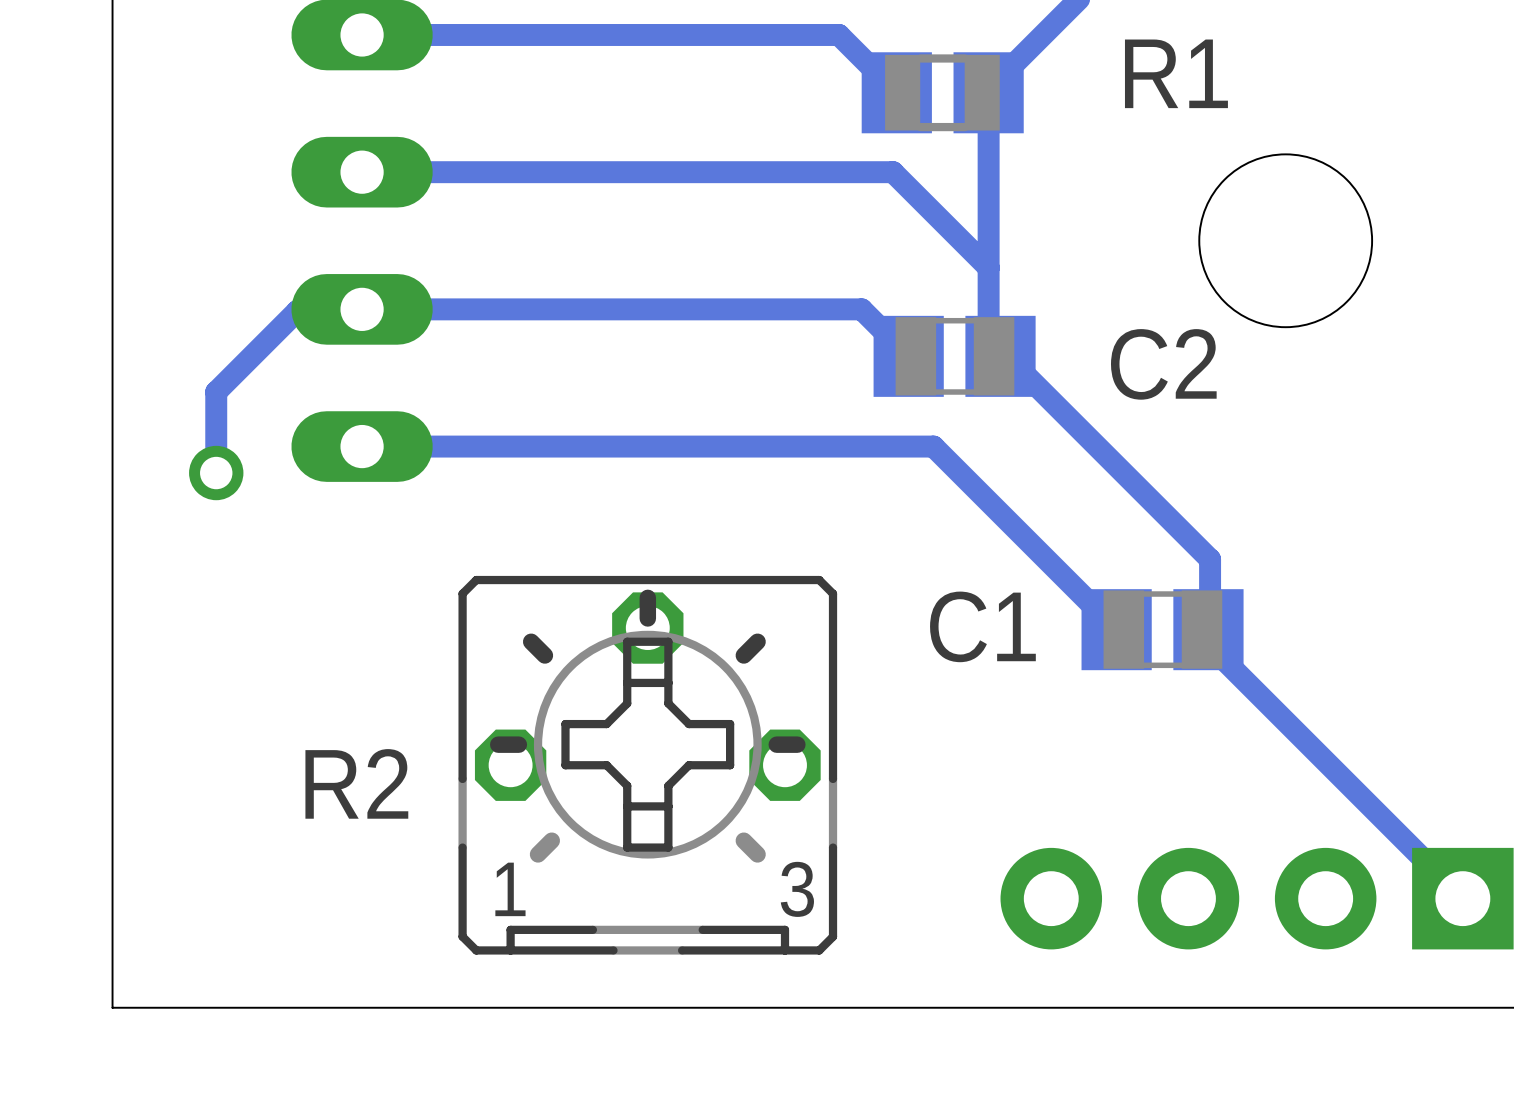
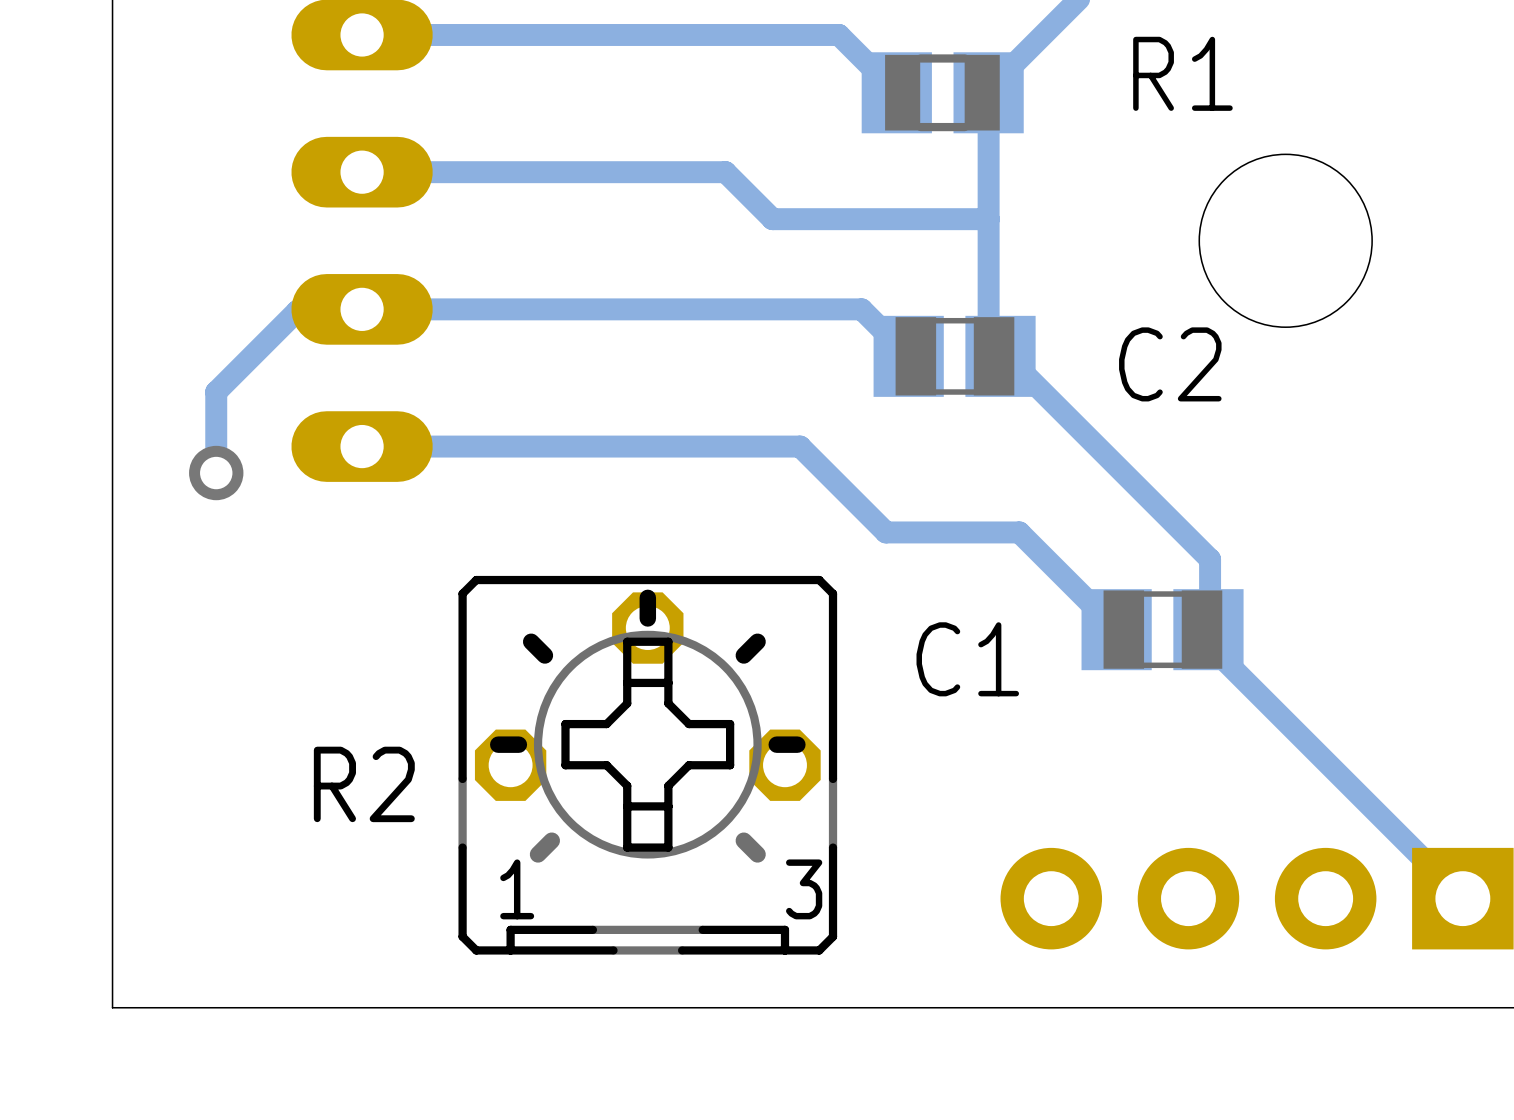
track: (725, 172) (893, 172) (988, 267) -> (725, 172) (772, 219) (988, 219)
track: (800, 446) (933, 446) (1019, 532) -> (800, 446) (886, 532) (1019, 532)
C1 name position: C1 (982, 626) -> C1 (967, 659)

